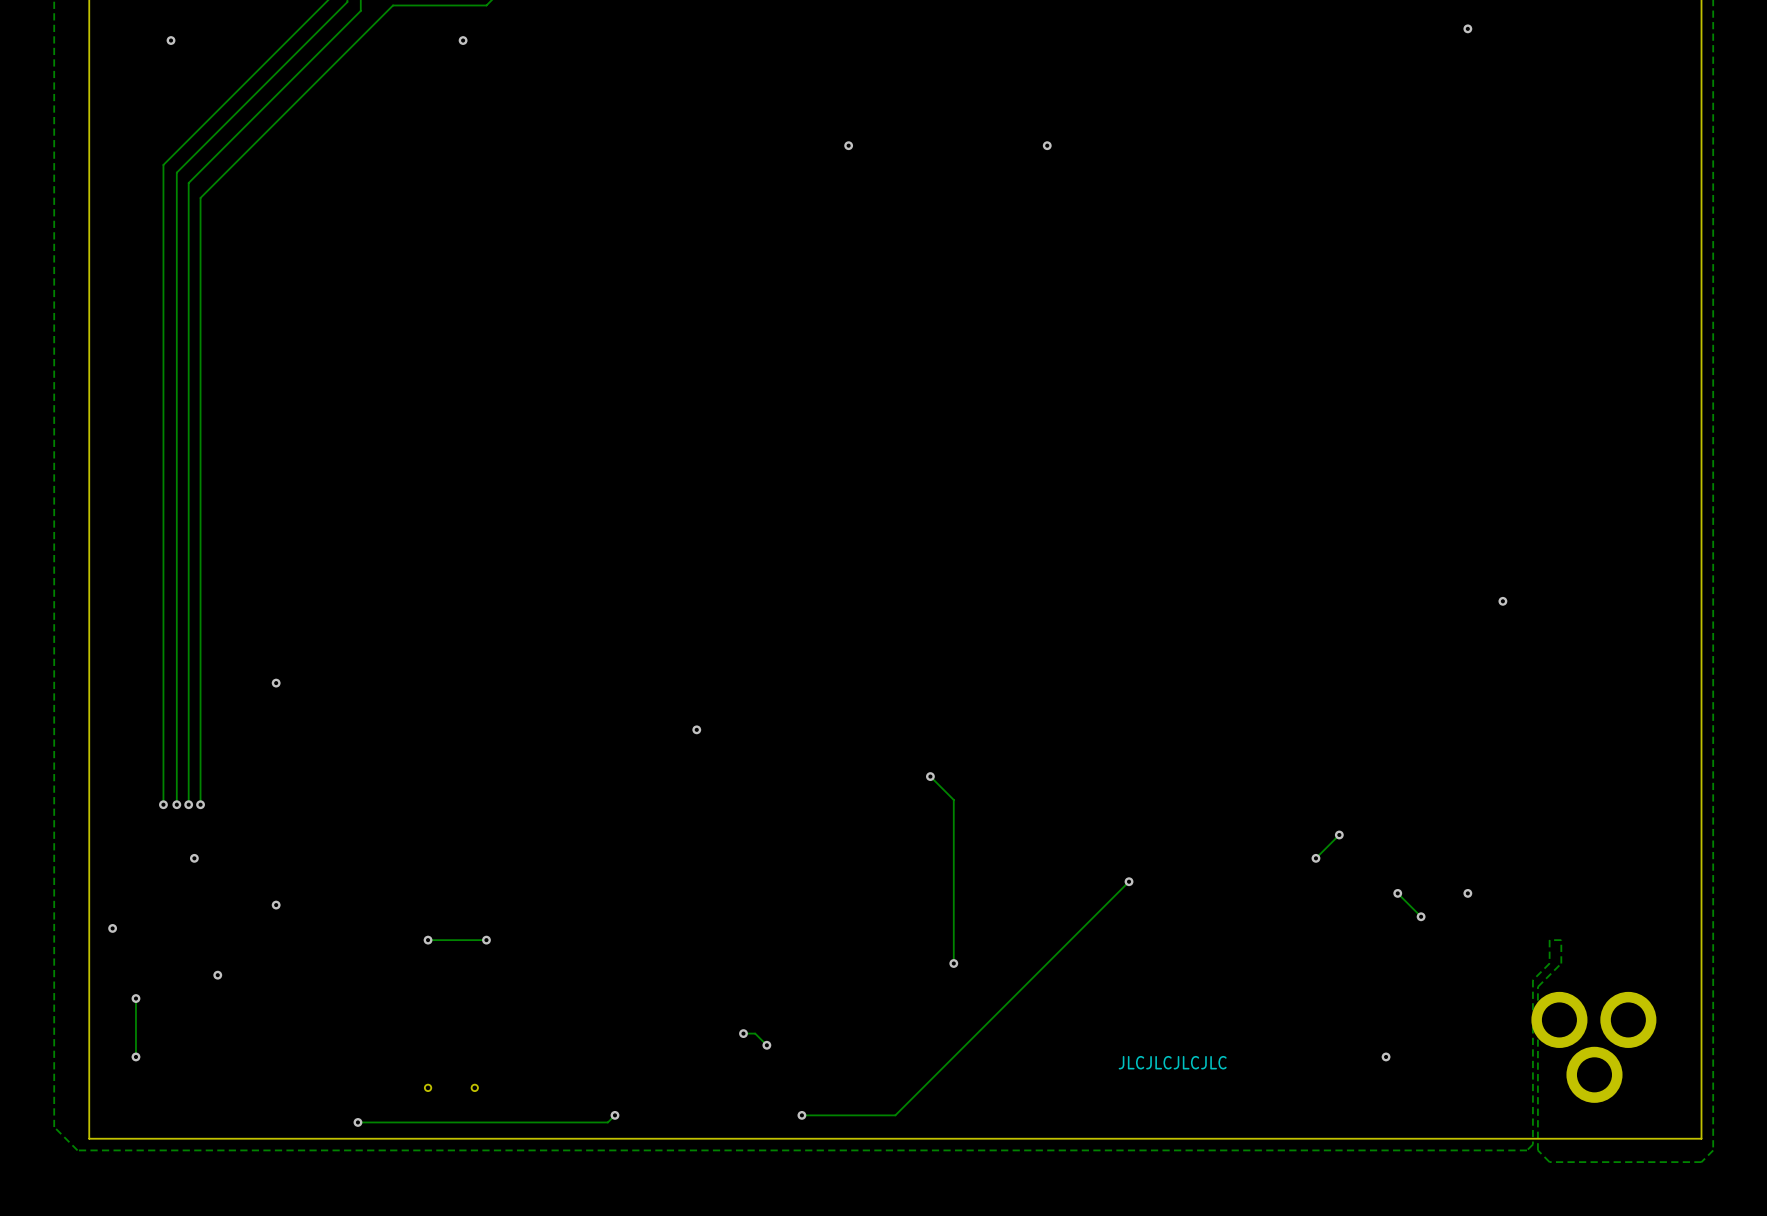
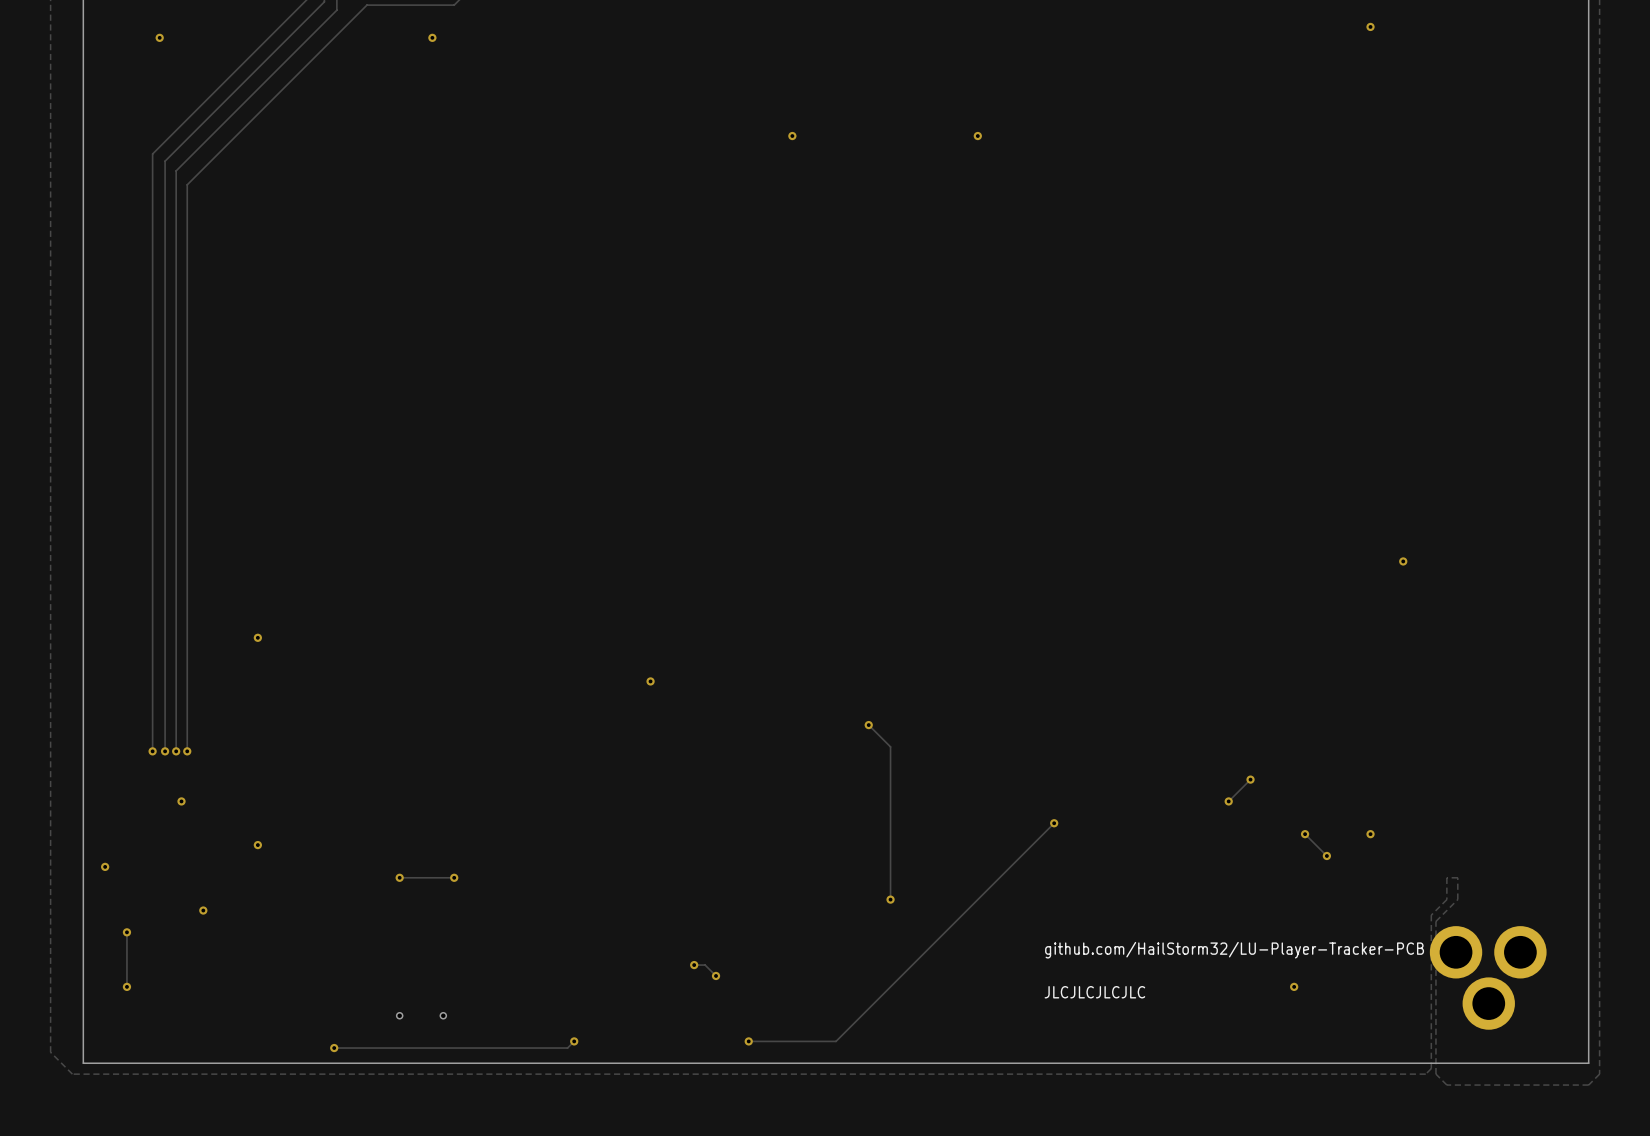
text: none -> github.com/HailStorm32/LU-Player-Tracker-PCB (1234, 950)

